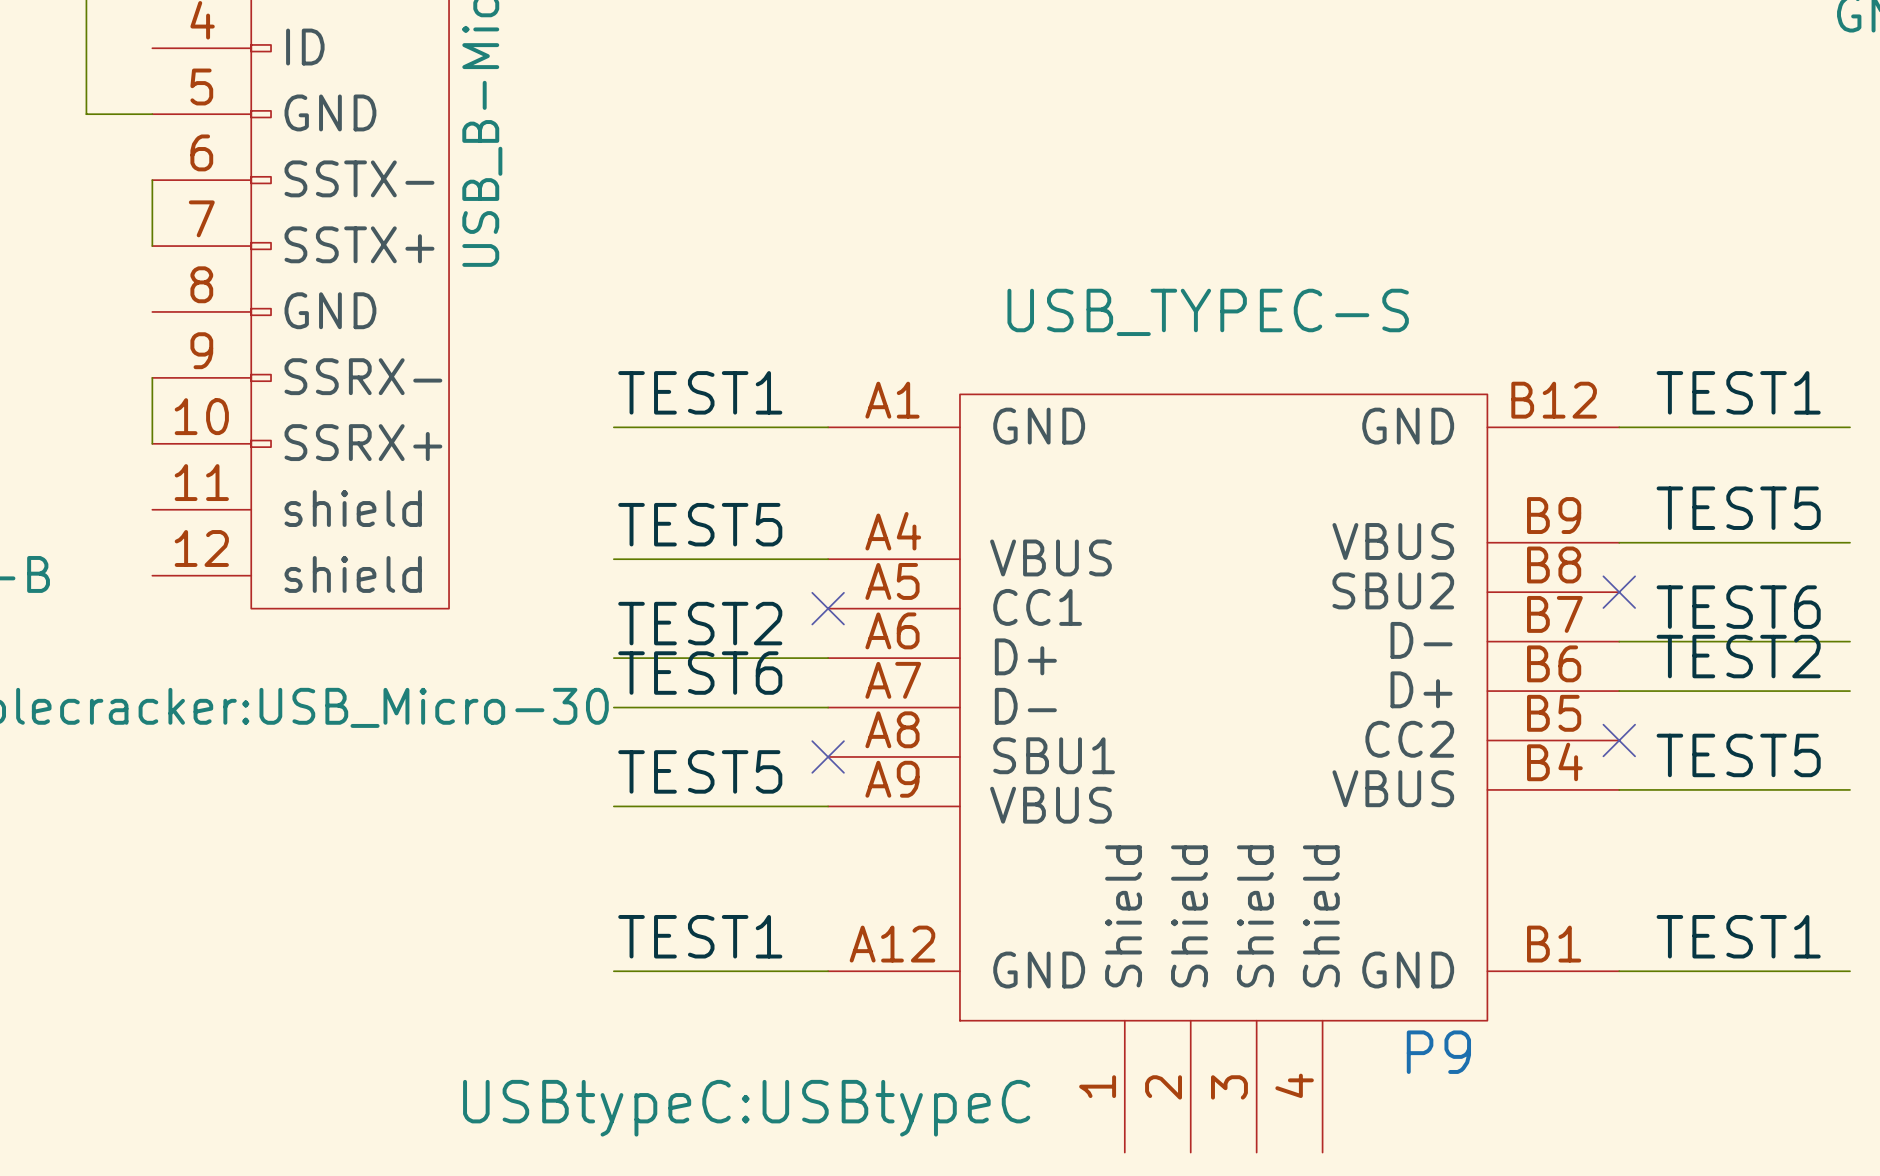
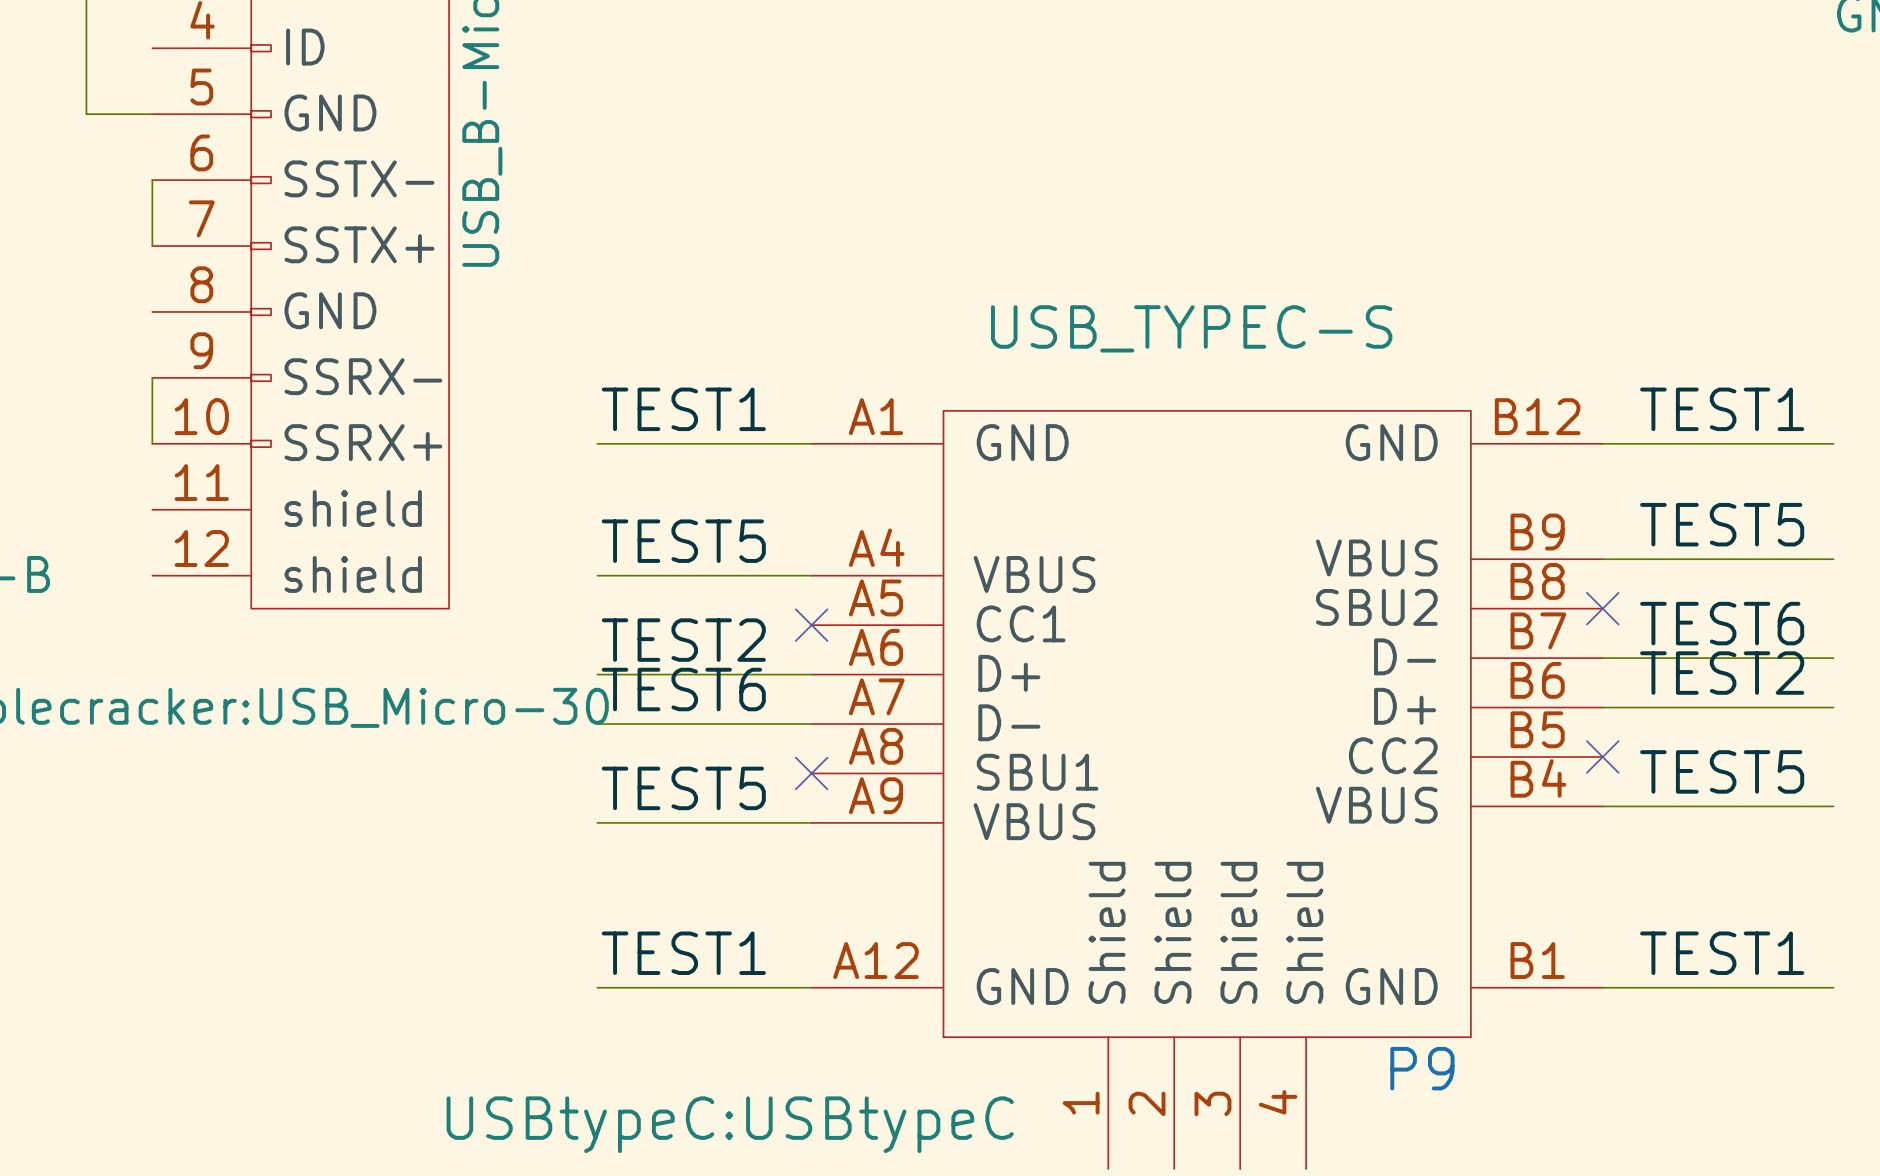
label position: TEST1 (700, 392) -> TEST1 (683, 409)
label position: TEST1 (1738, 392) -> TEST1 (1722, 409)
wire: (613, 427) (828, 427) -> (597, 443) (811, 443)
wire: (1619, 427) (1850, 427) -> (1602, 443) (1833, 443)
label position: TEST5 (1738, 508) -> TEST5 (1722, 524)
label position: TEST5 (700, 524) -> TEST5 (683, 541)
wire: (1619, 542) (1850, 542) -> (1602, 559) (1833, 559)
wire: (613, 559) (828, 559) -> (597, 575) (811, 575)
no-connect mark position: (1619, 592) -> (1602, 608)
label position: TEST6 (1738, 607) -> TEST6 (1722, 623)
no-connect mark position: (828, 608) -> (811, 625)
label position: TEST2 (700, 623) -> TEST2 (683, 640)
wire: (1619, 641) (1850, 641) -> (1602, 658) (1833, 658)
label position: TEST2 (1738, 656) -> TEST2 (1722, 673)
wire: (613, 658) (828, 658) -> (597, 674) (811, 674)
label position: TEST6 (700, 673) -> TEST6 (683, 689)
wire: (1619, 691) (1850, 691) -> (1602, 707) (1833, 707)
wire: (613, 707) (828, 707) -> (597, 724) (811, 724)
no-connect mark position: (1619, 740) -> (1602, 756)
label position: TEST5 (1738, 755) -> TEST5 (1722, 771)
no-connect mark position: (828, 756) -> (811, 773)
label position: TEST5 (700, 771) -> TEST5 (683, 788)
P9 position: (1223, 773) -> (1207, 789)
wire: (1619, 789) (1850, 789) -> (1602, 806) (1833, 806)
wire: (613, 806) (828, 806) -> (597, 822) (811, 822)
label position: TEST1 (700, 936) -> TEST1 (683, 953)
label position: TEST1 (1738, 936) -> TEST1 (1722, 953)
wire: (613, 971) (828, 971) -> (597, 987) (811, 987)
wire: (1619, 971) (1850, 971) -> (1602, 987) (1833, 987)

